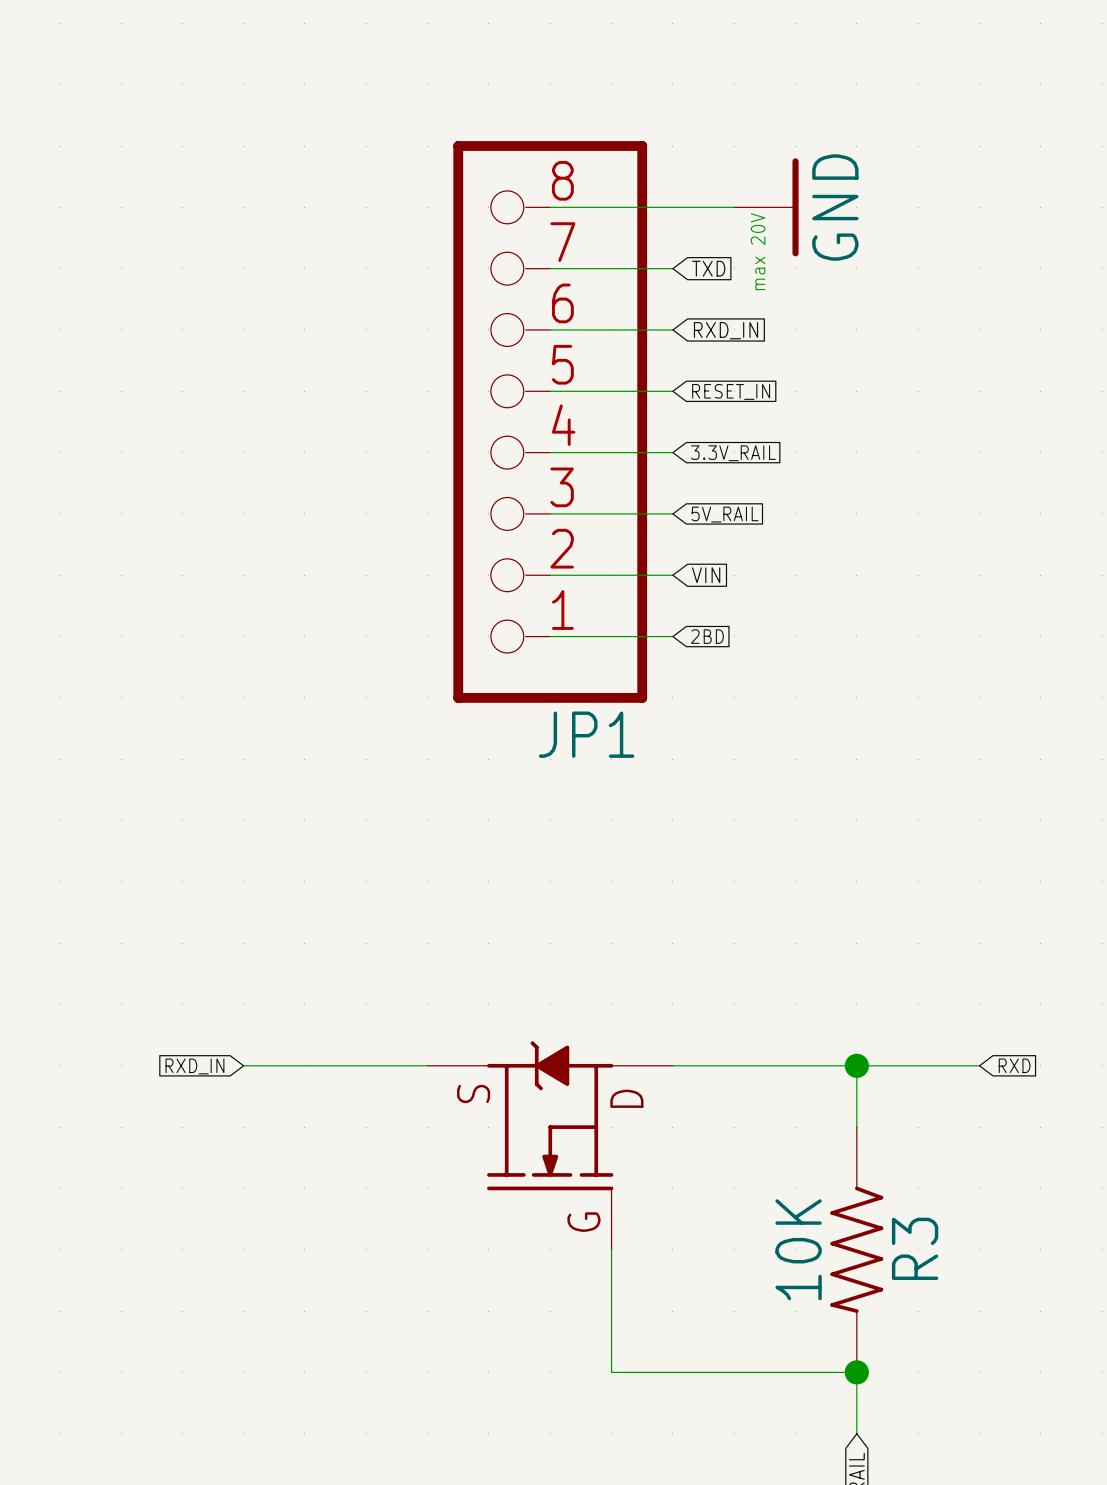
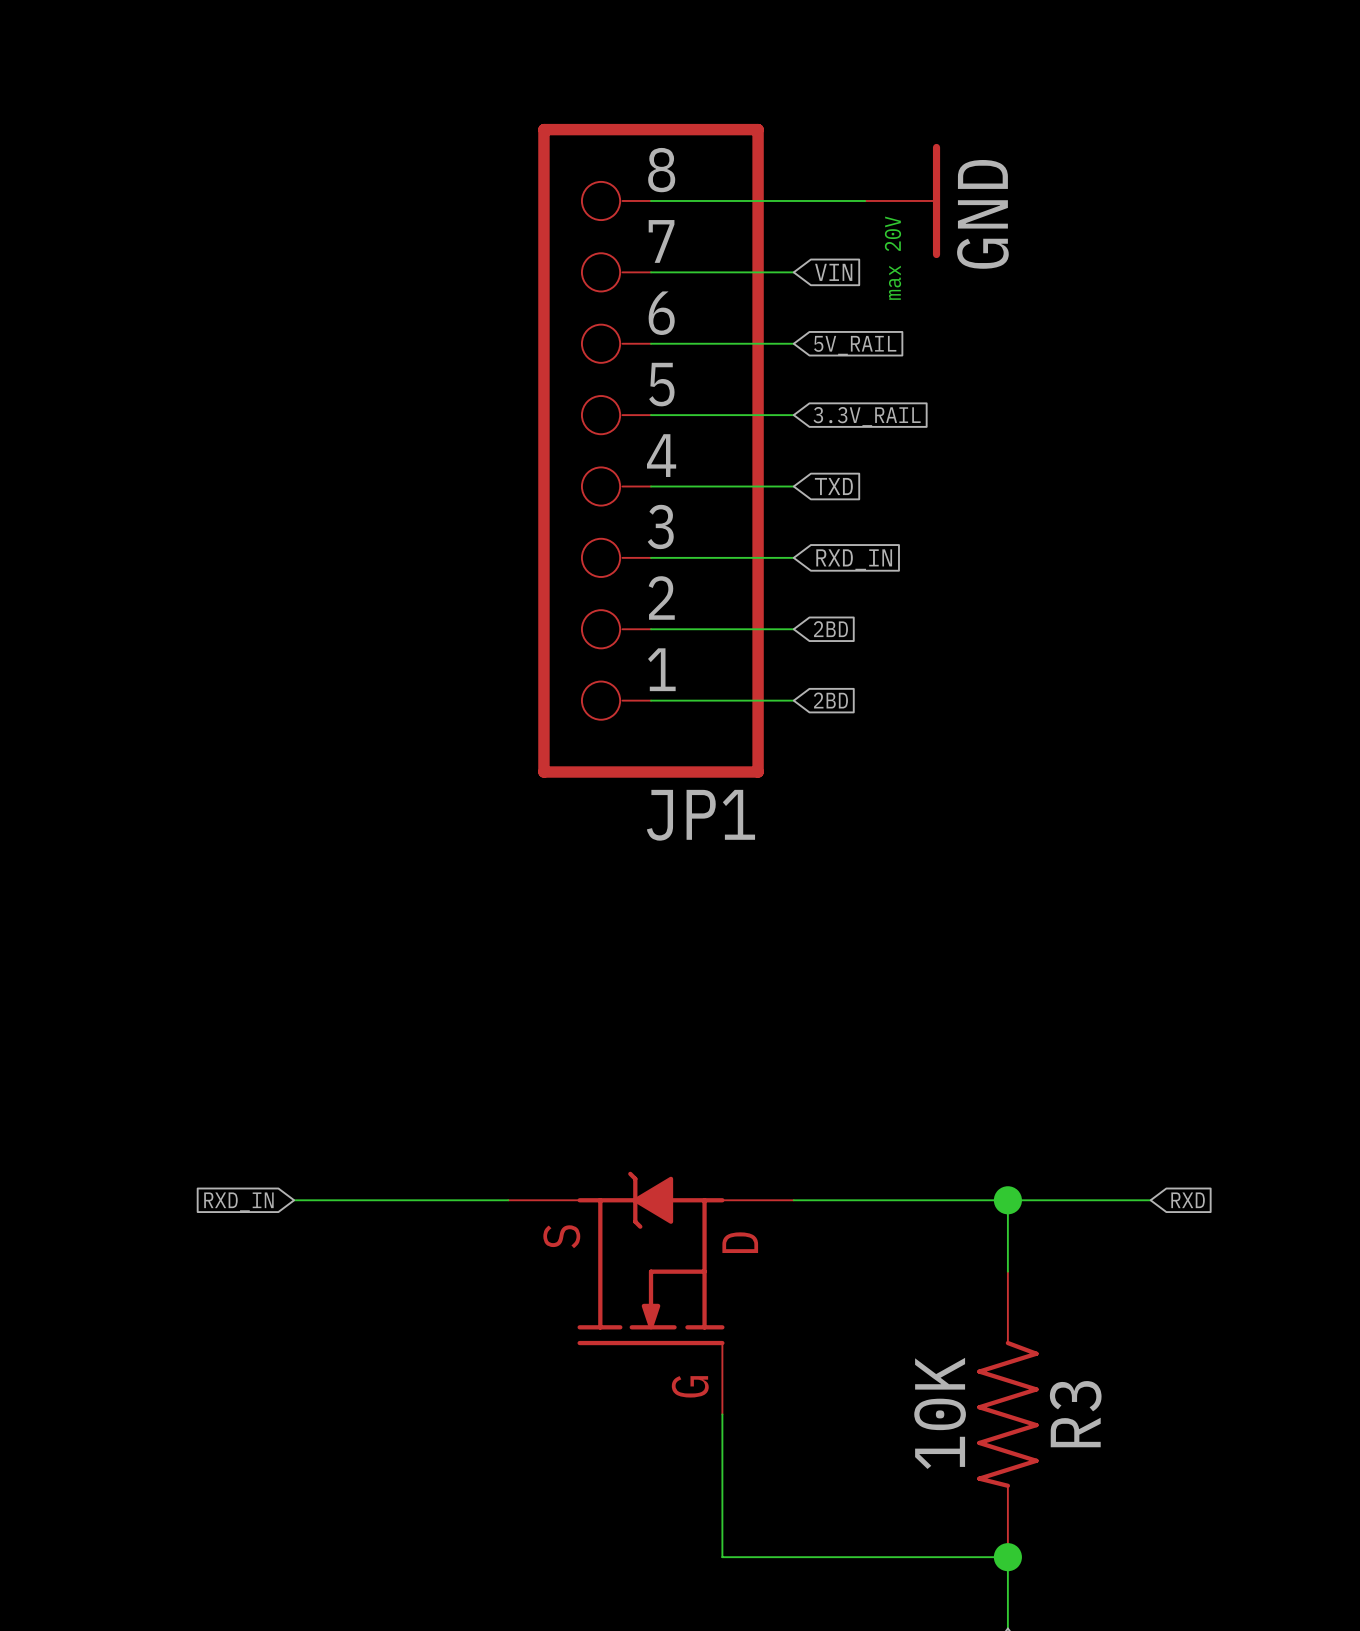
global label: TXD (708, 268) -> VIN (833, 272)
global label: RXD_IN (726, 330) -> 5V_RAIL (855, 345)
global label: RESET_IN (731, 391) -> 3.3V_RAIL (867, 416)
global label: 3.3V_RAIL (733, 453) -> TXD (833, 486)
global label: 5V_RAIL (725, 514) -> RXD_IN (854, 559)
global label: VIN (706, 575) -> 2BD (830, 629)

